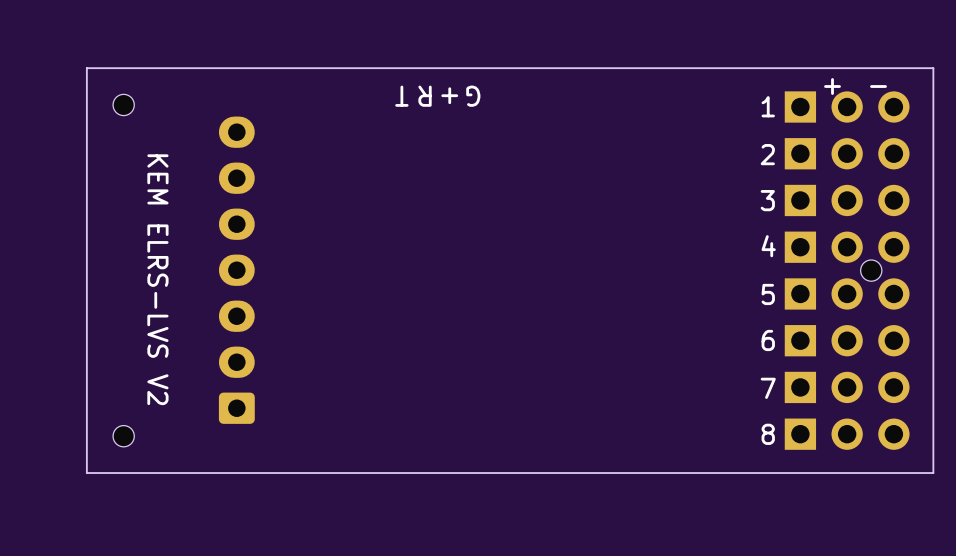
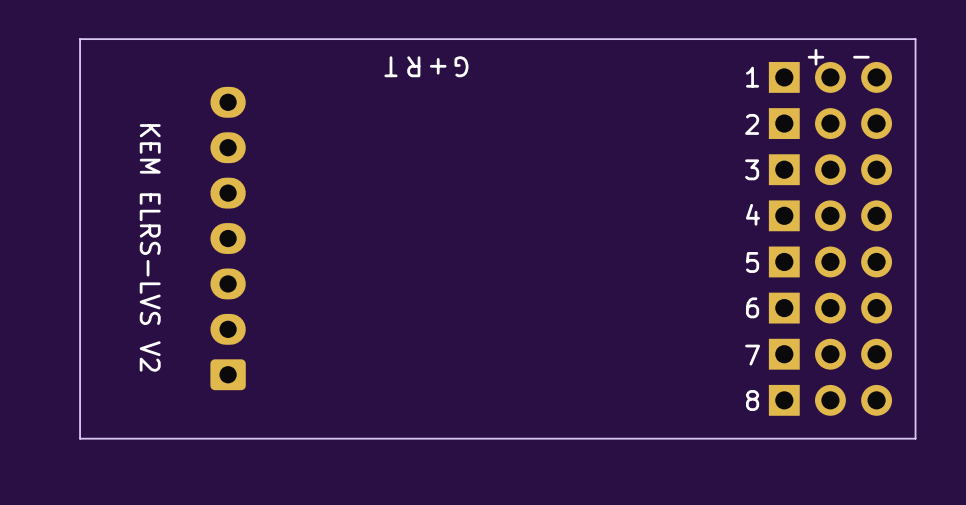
part: (123, 104) -> none
part: (871, 270) -> none
part: (123, 436) -> none

